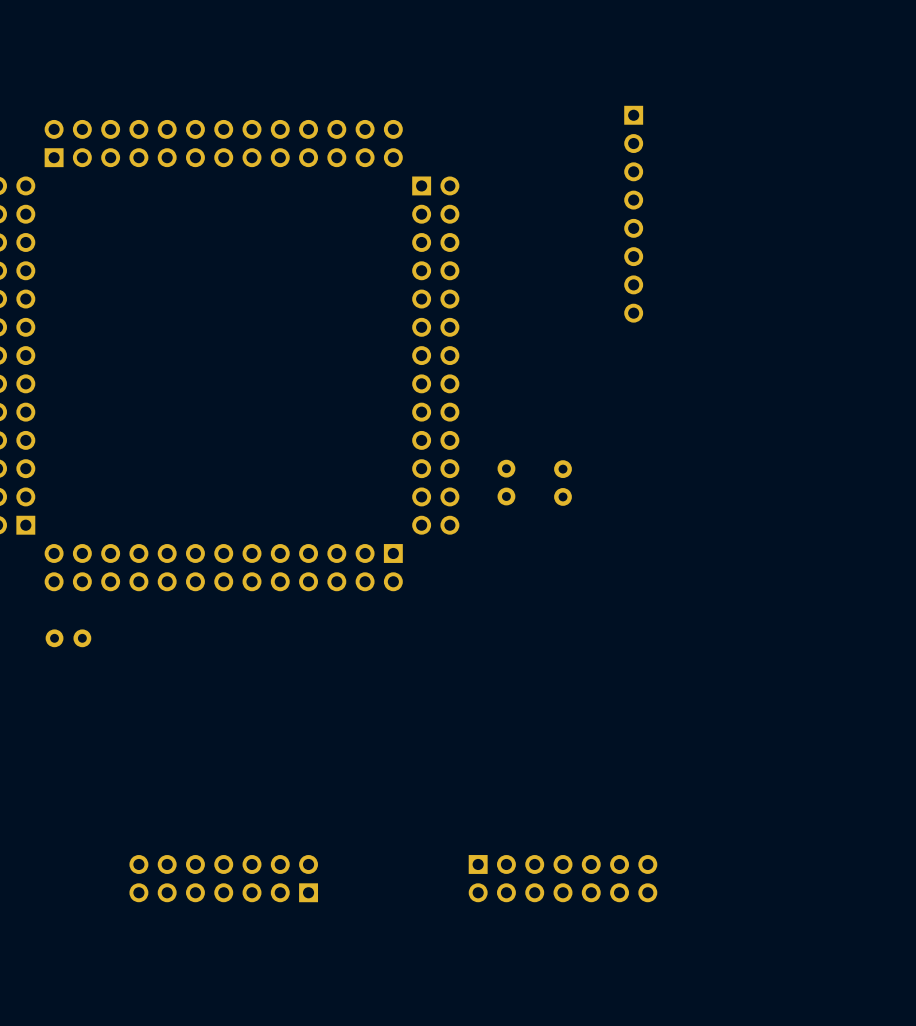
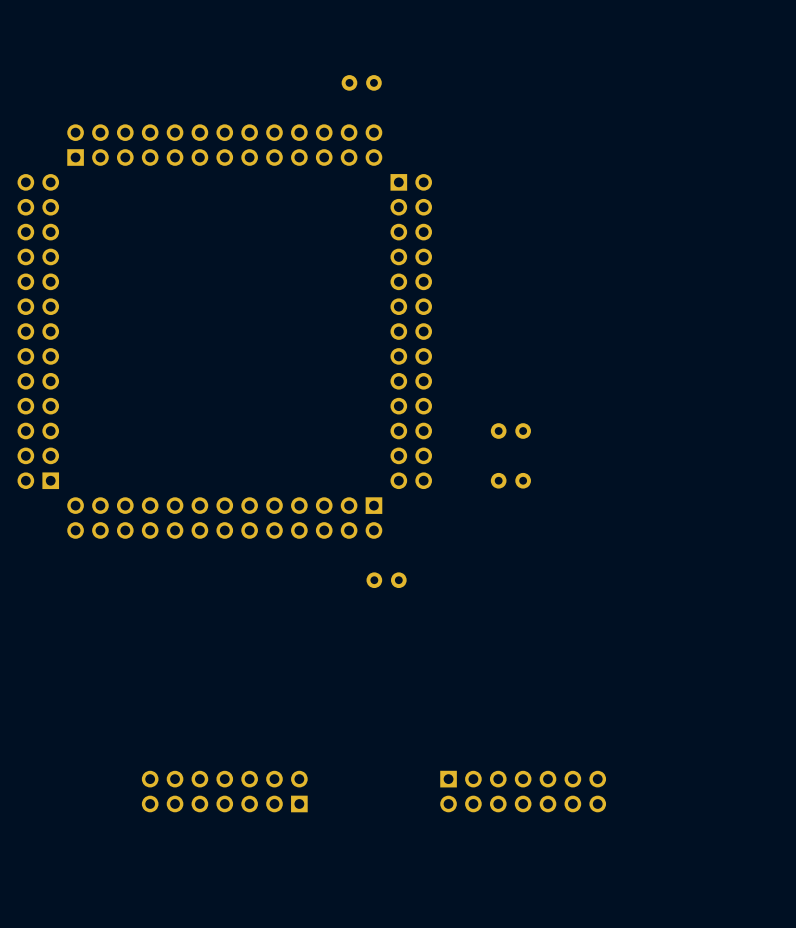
part: none -> (361, 82)
part: (633, 214) -> none
part: (506, 482) -> none
part rotation: 0° (563, 483) -> 90° clockwise (510, 431)
part: none -> (510, 480)
part: (68, 638) -> none
part: none -> (386, 580)

